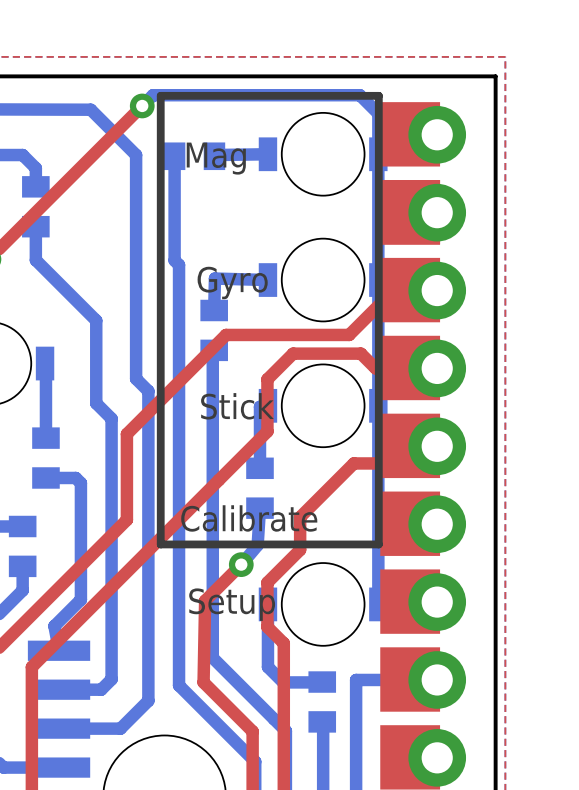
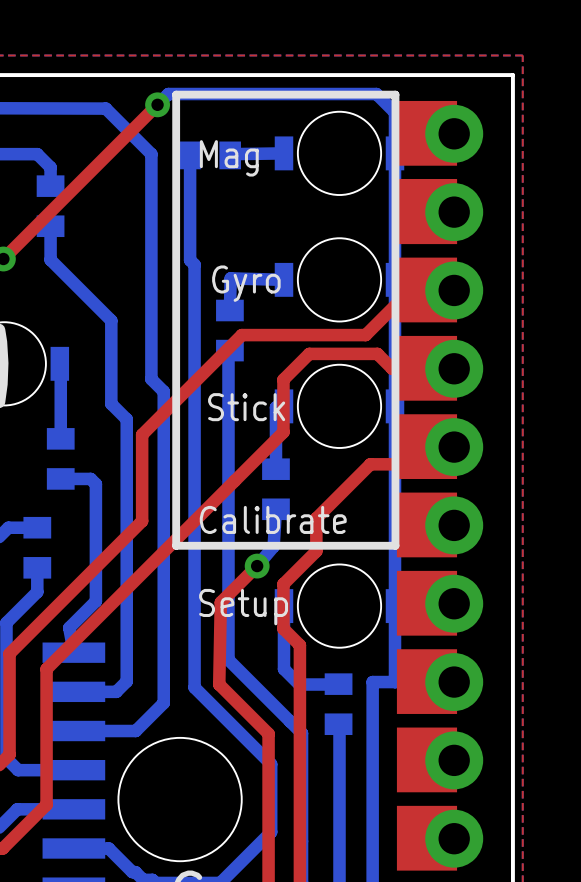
bottom track: none -> (395, 606) (395, 682)

